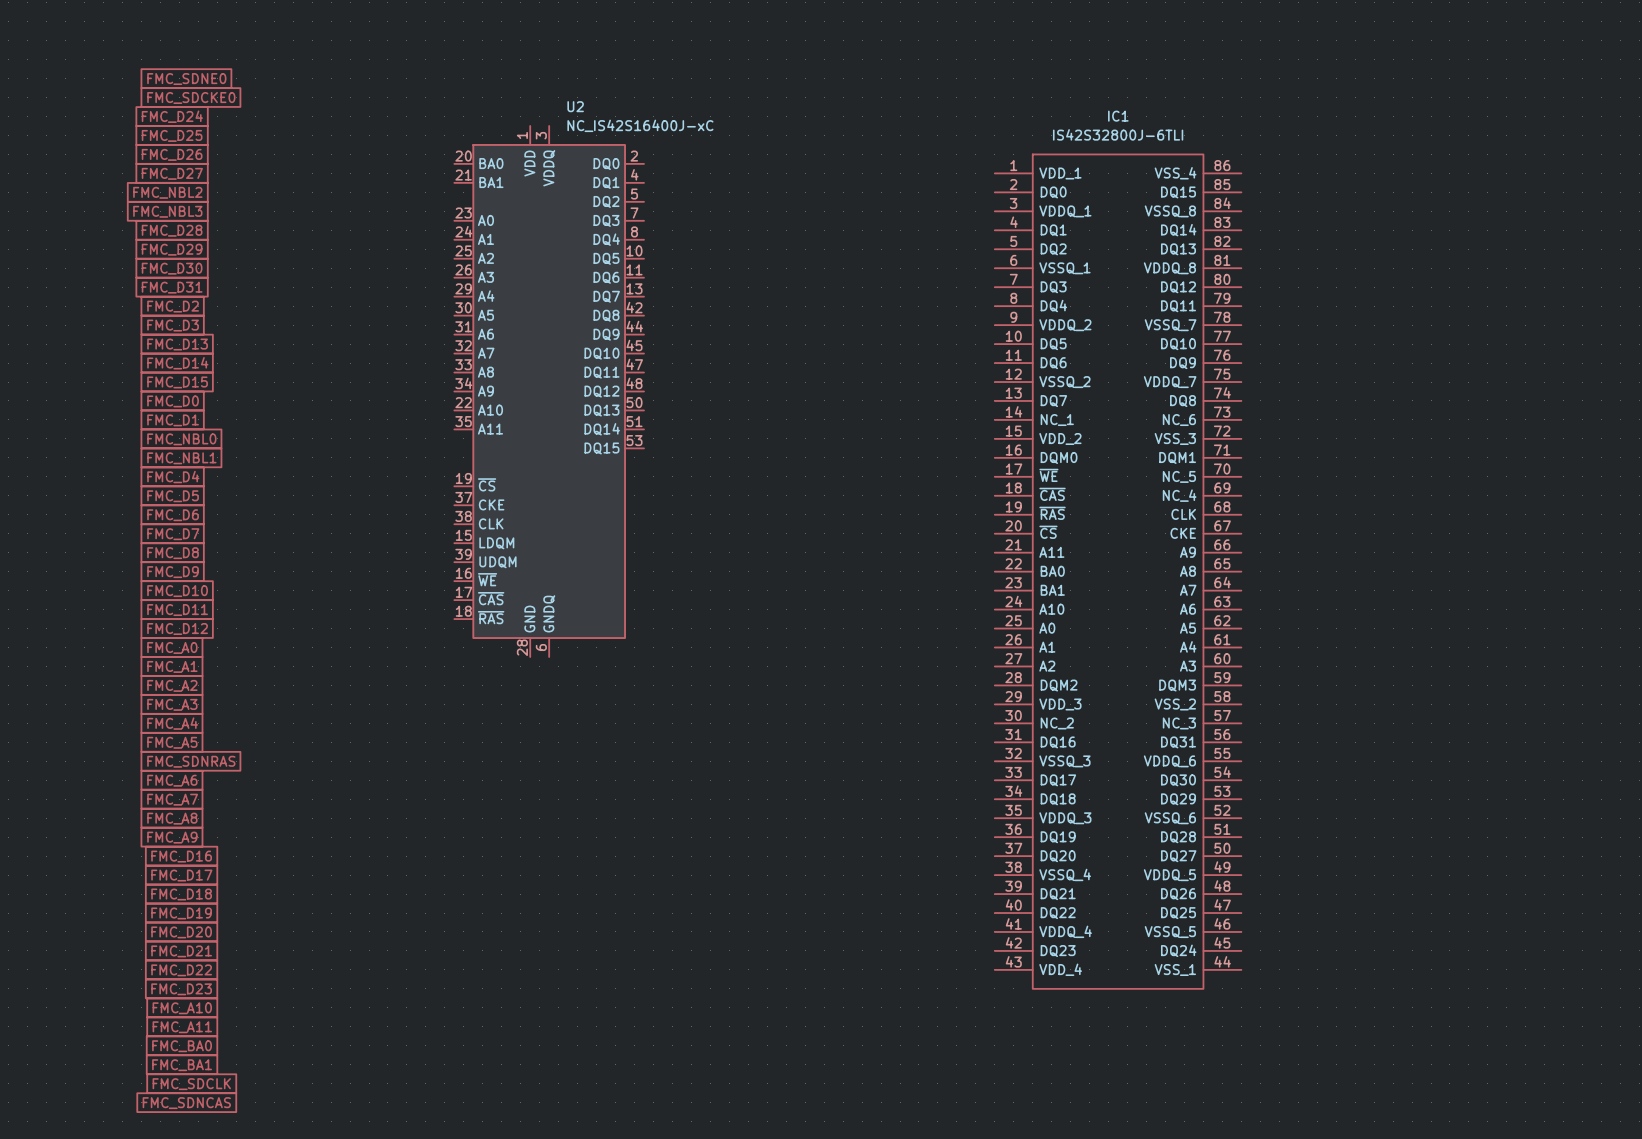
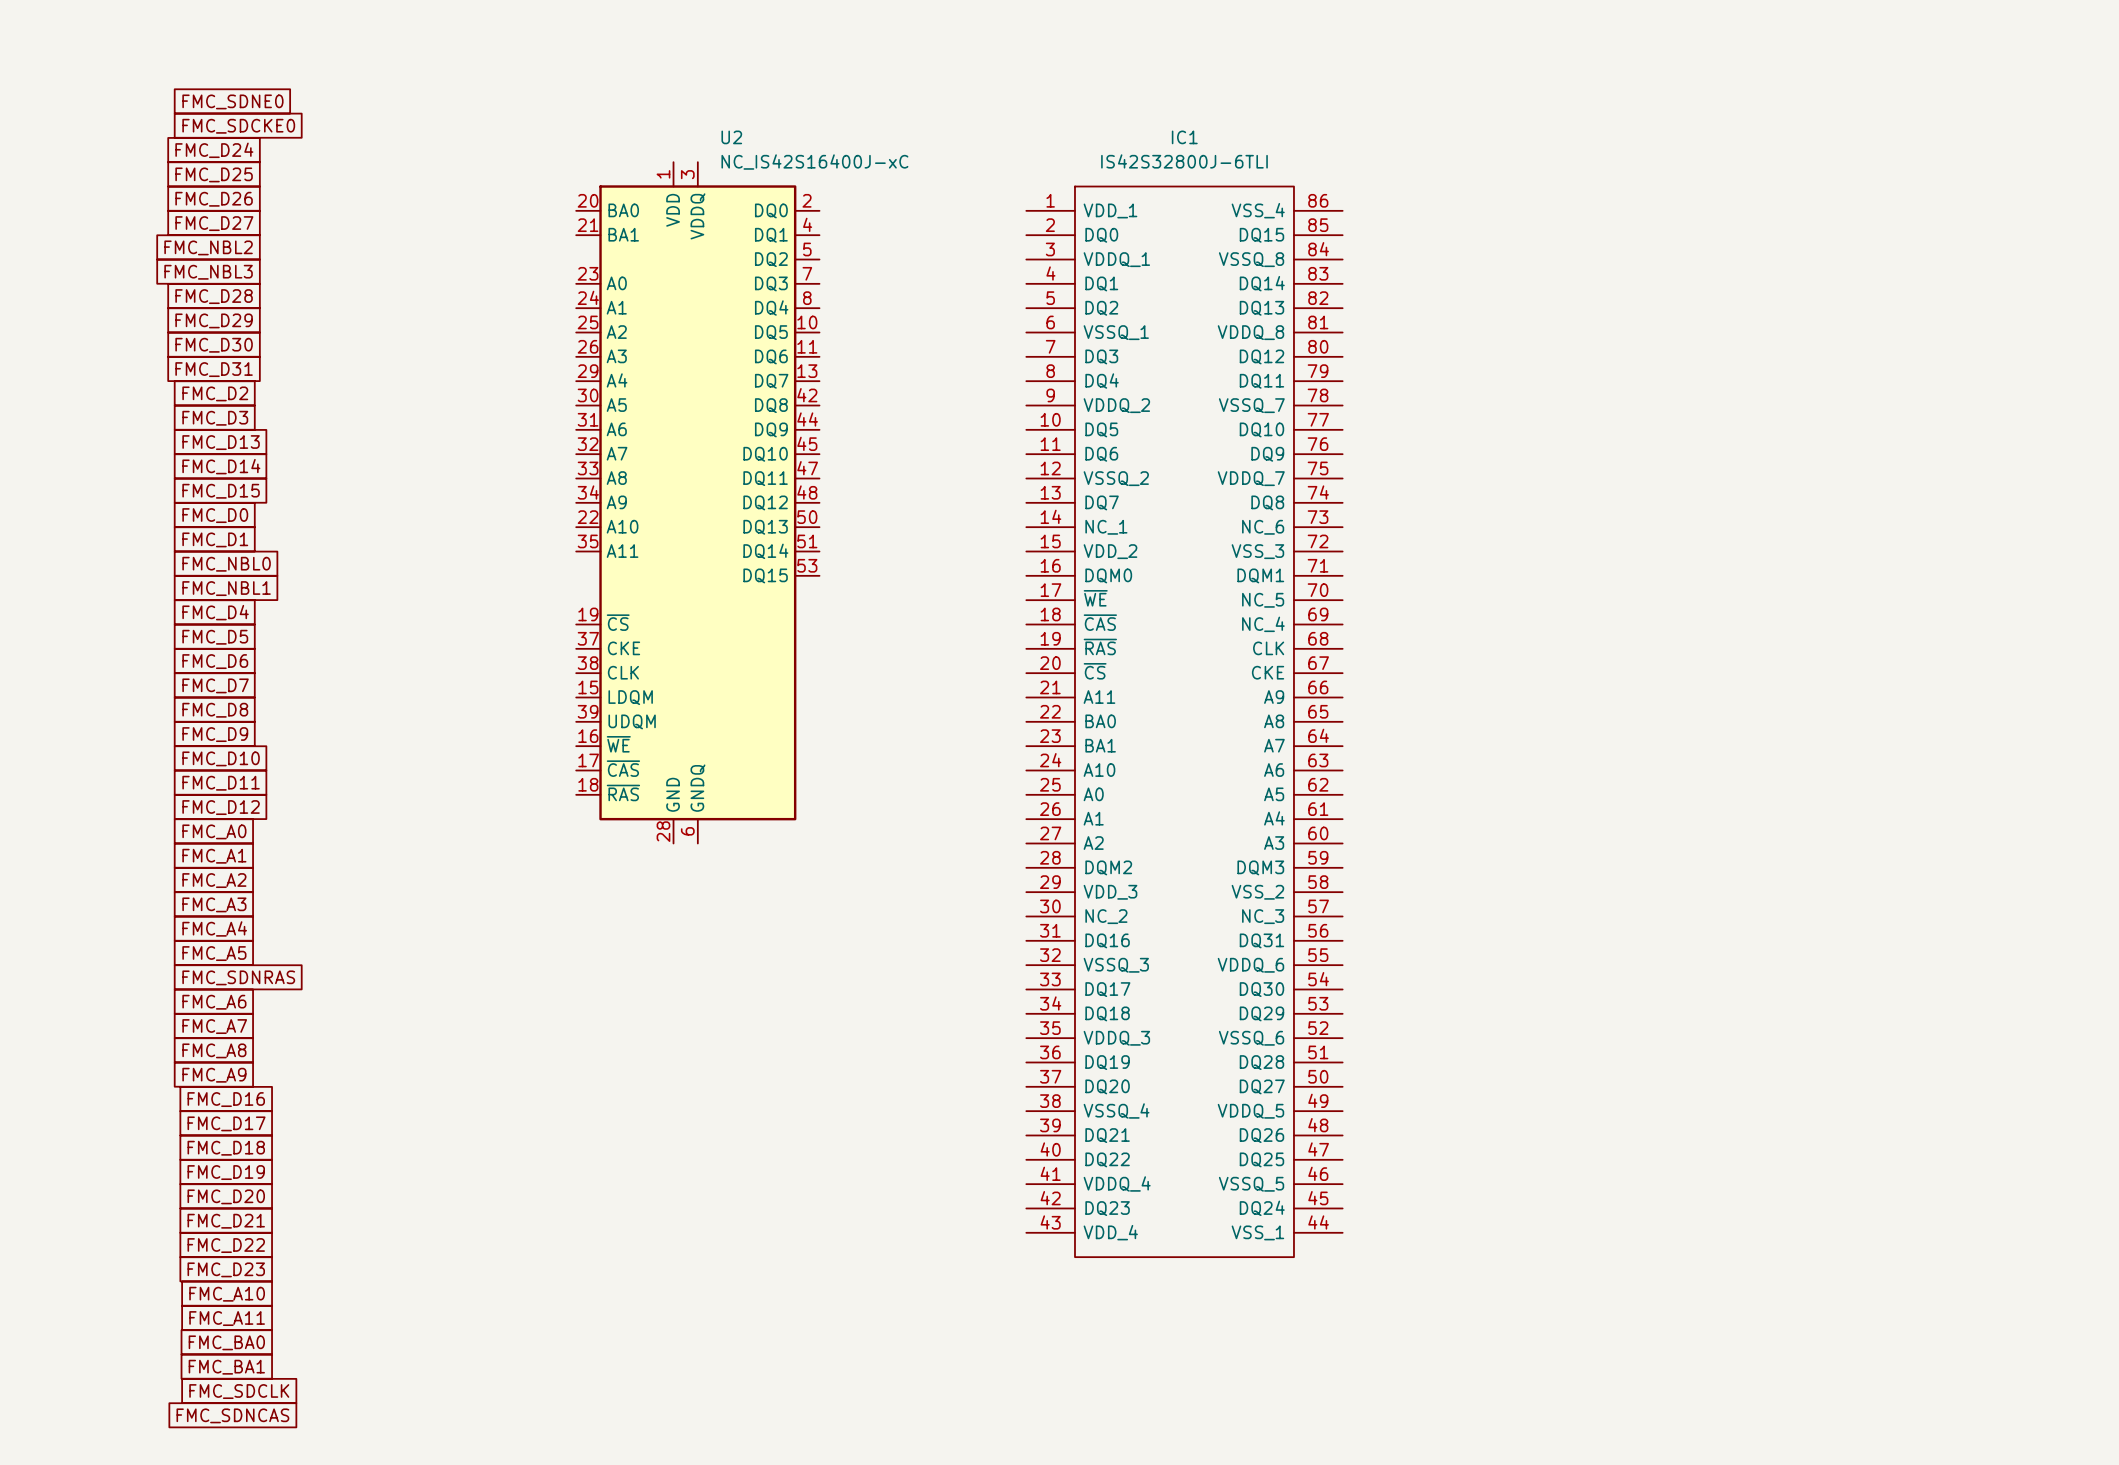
IC1 position: (1118, 571) -> (1184, 721)

